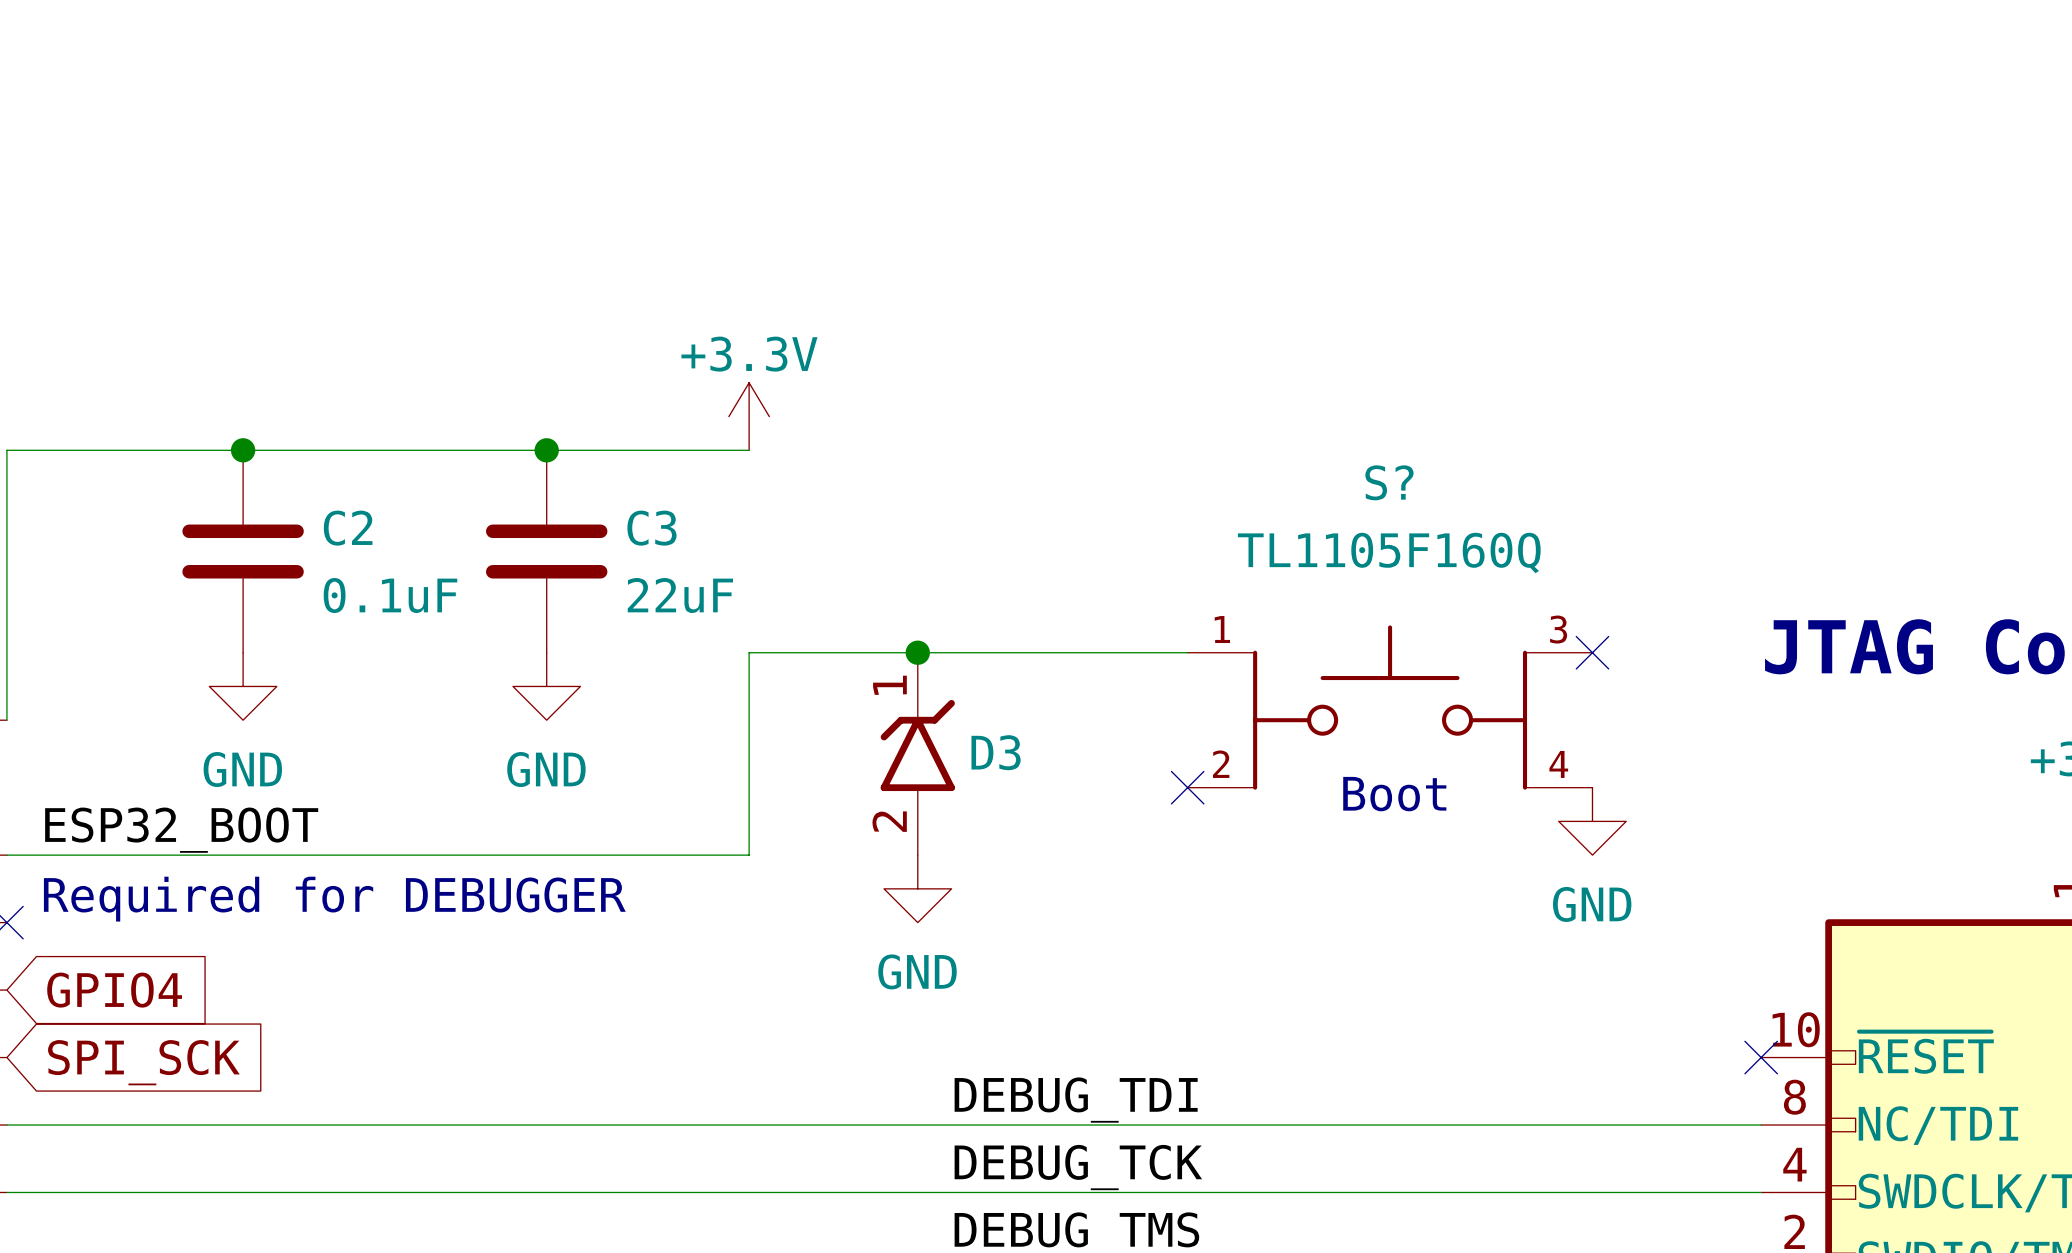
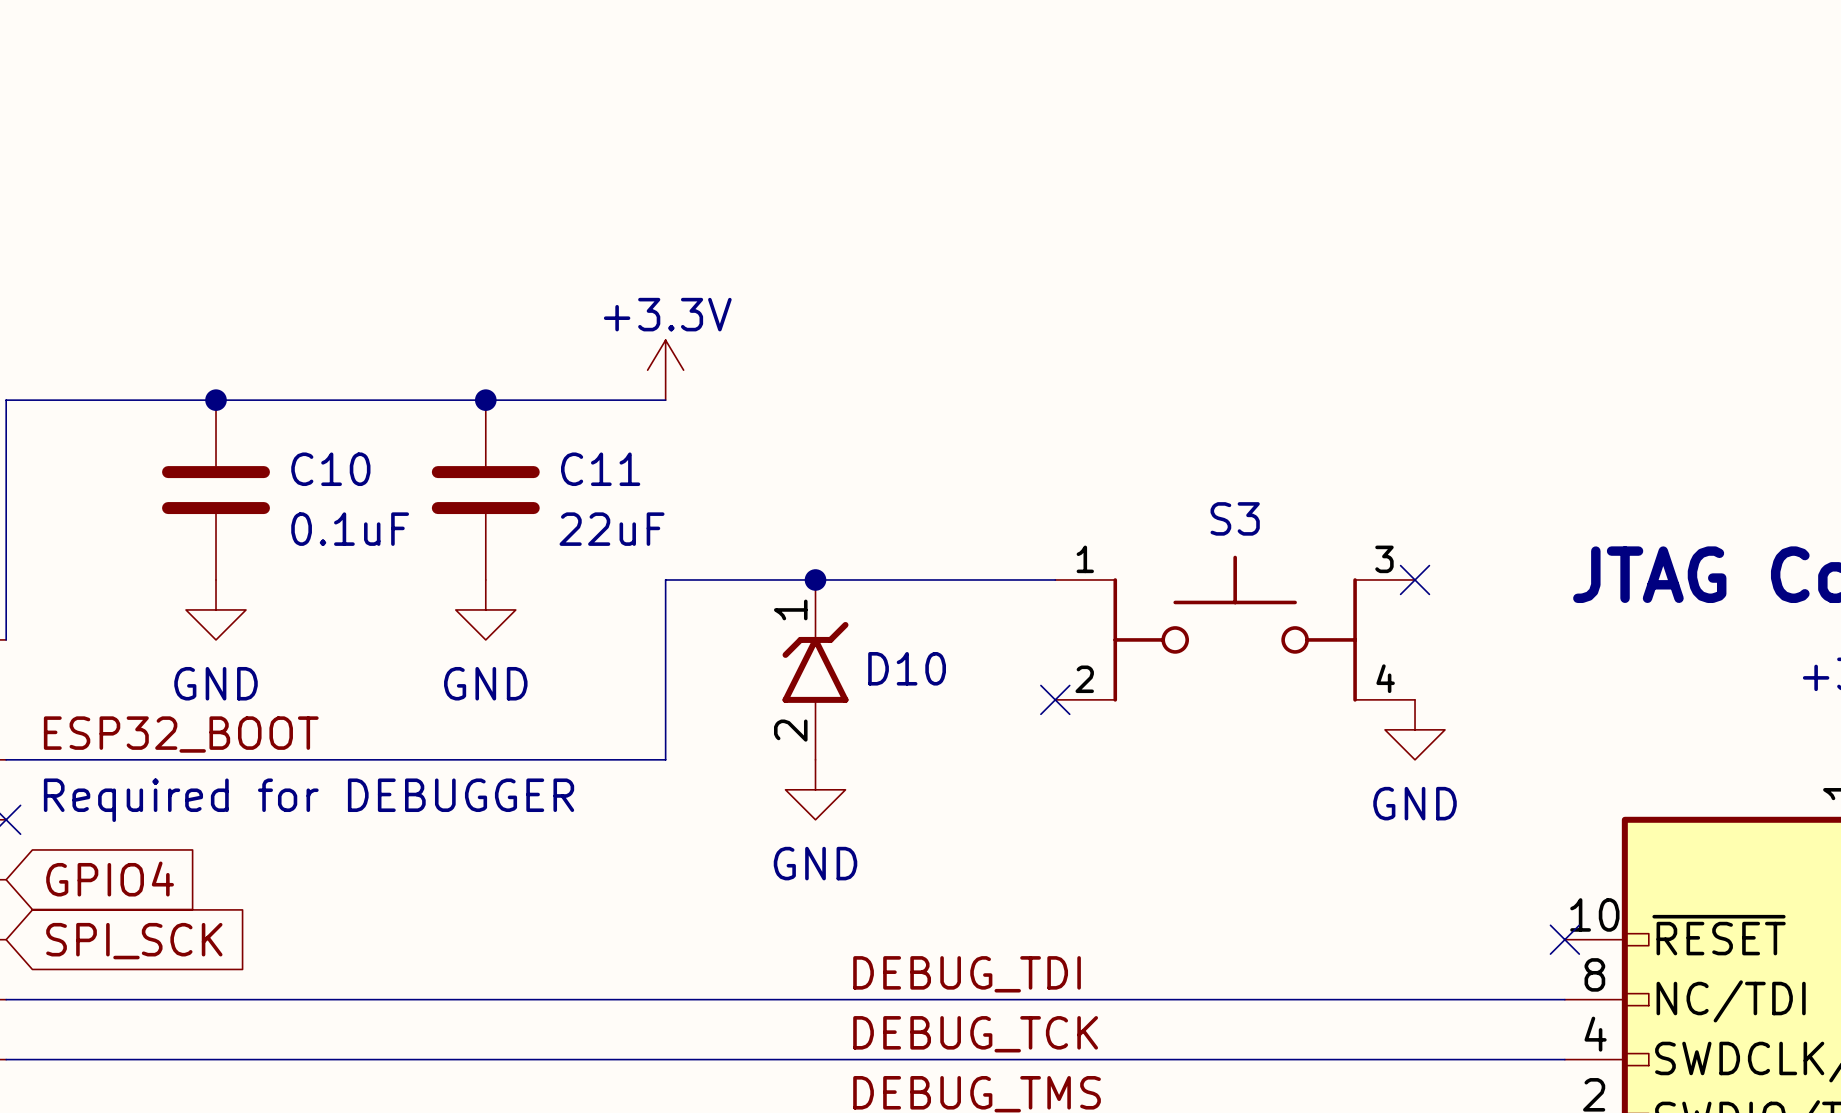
S? name: S? (1389, 482) -> S3 (1235, 518)
C2 name: C2 (348, 528) -> C10 (330, 469)
C3 name: C3 (651, 528) -> C11 (600, 469)
S? value: TL1105F160Q (1389, 553) -> none
D3 name: D3 (996, 752) -> D10 (907, 668)
text: Boot (1394, 794) -> none

